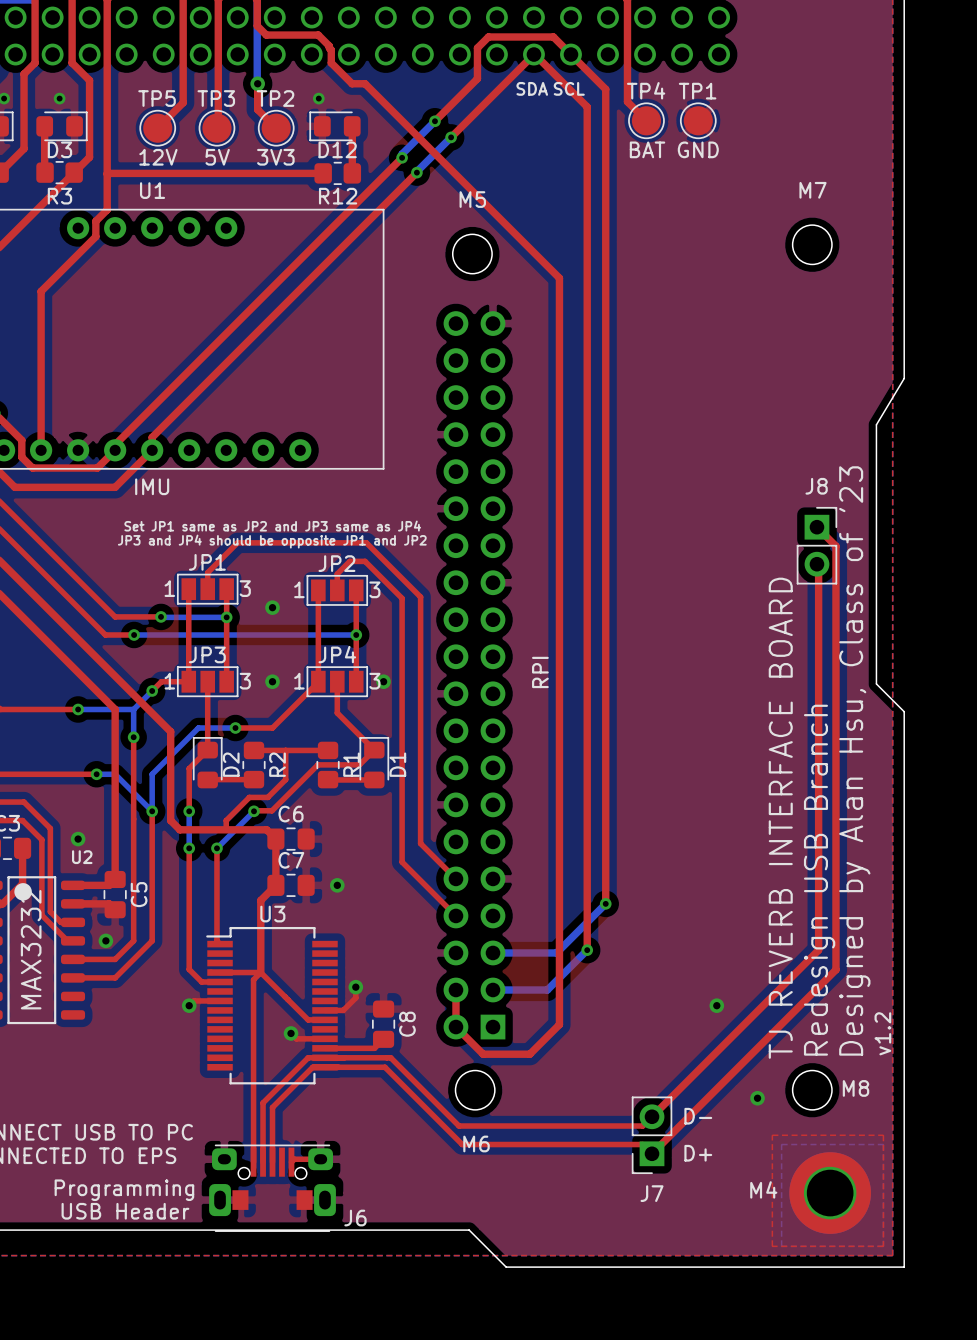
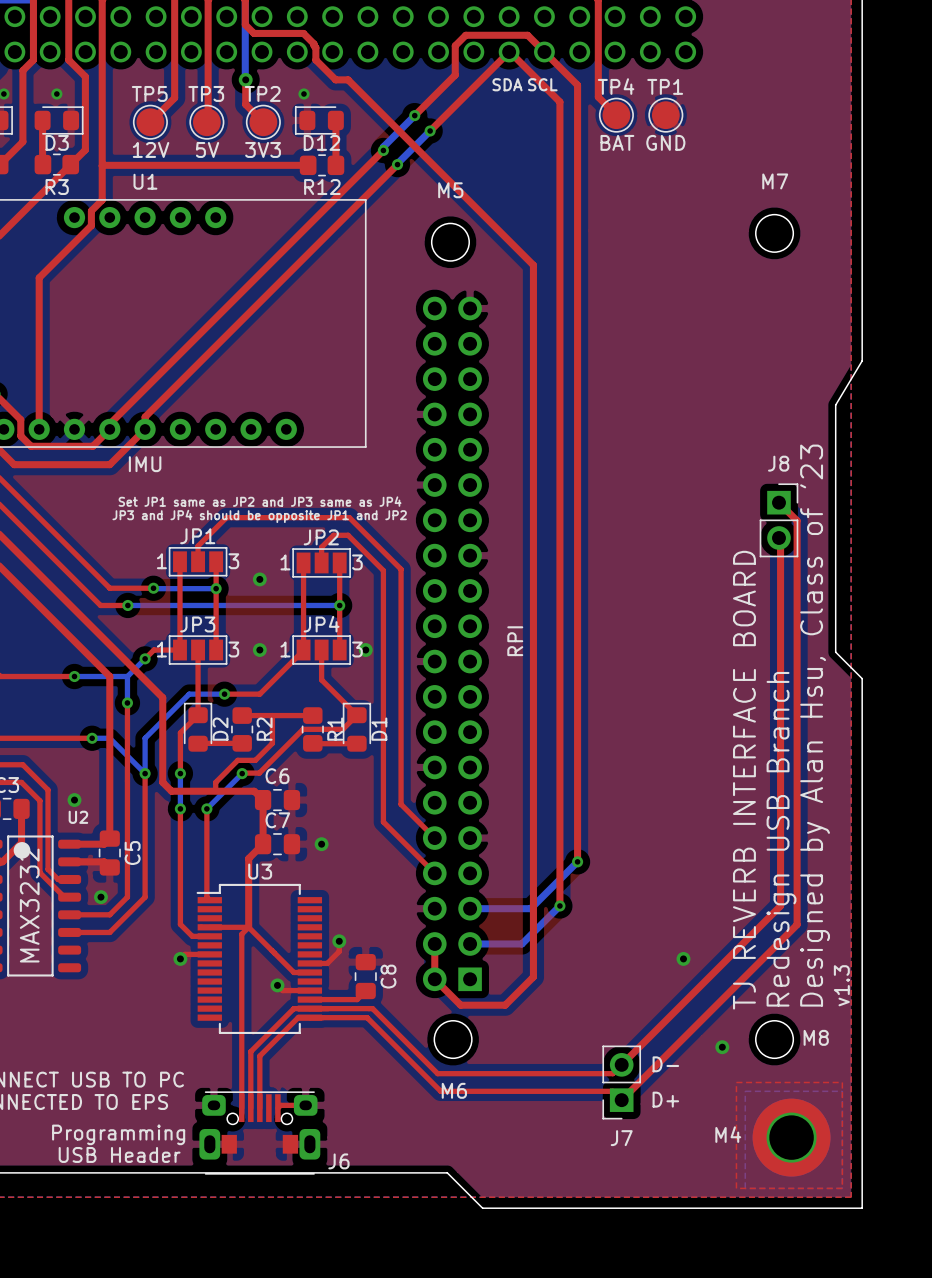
text: v1.2 (882, 1033) -> v1.3 (841, 985)

